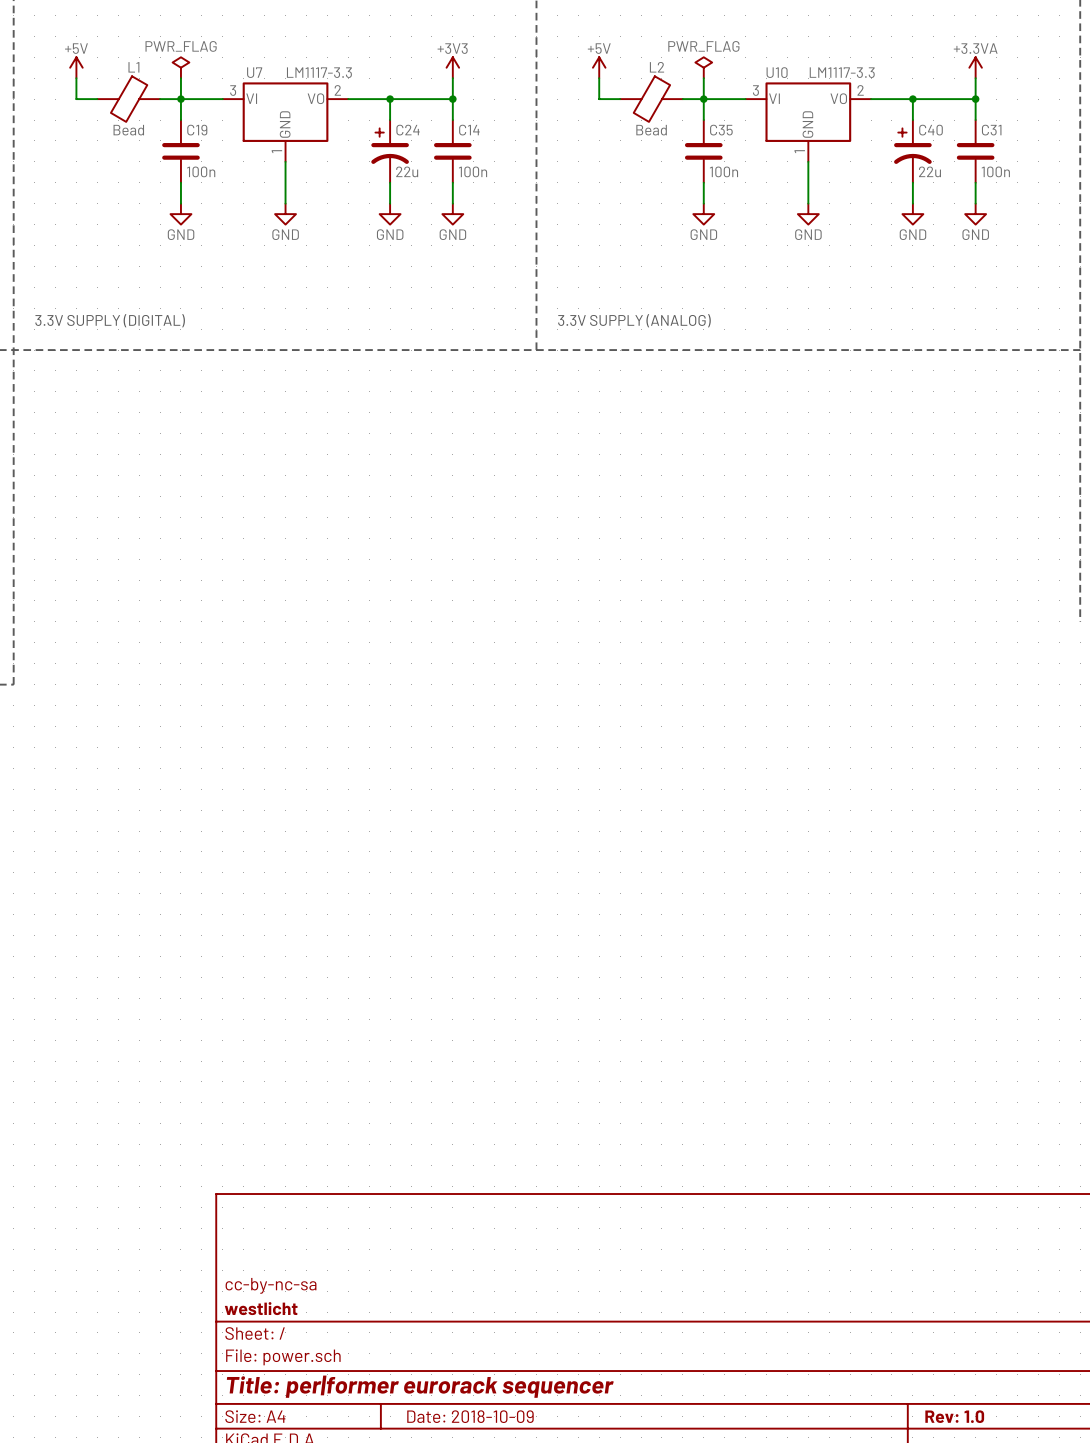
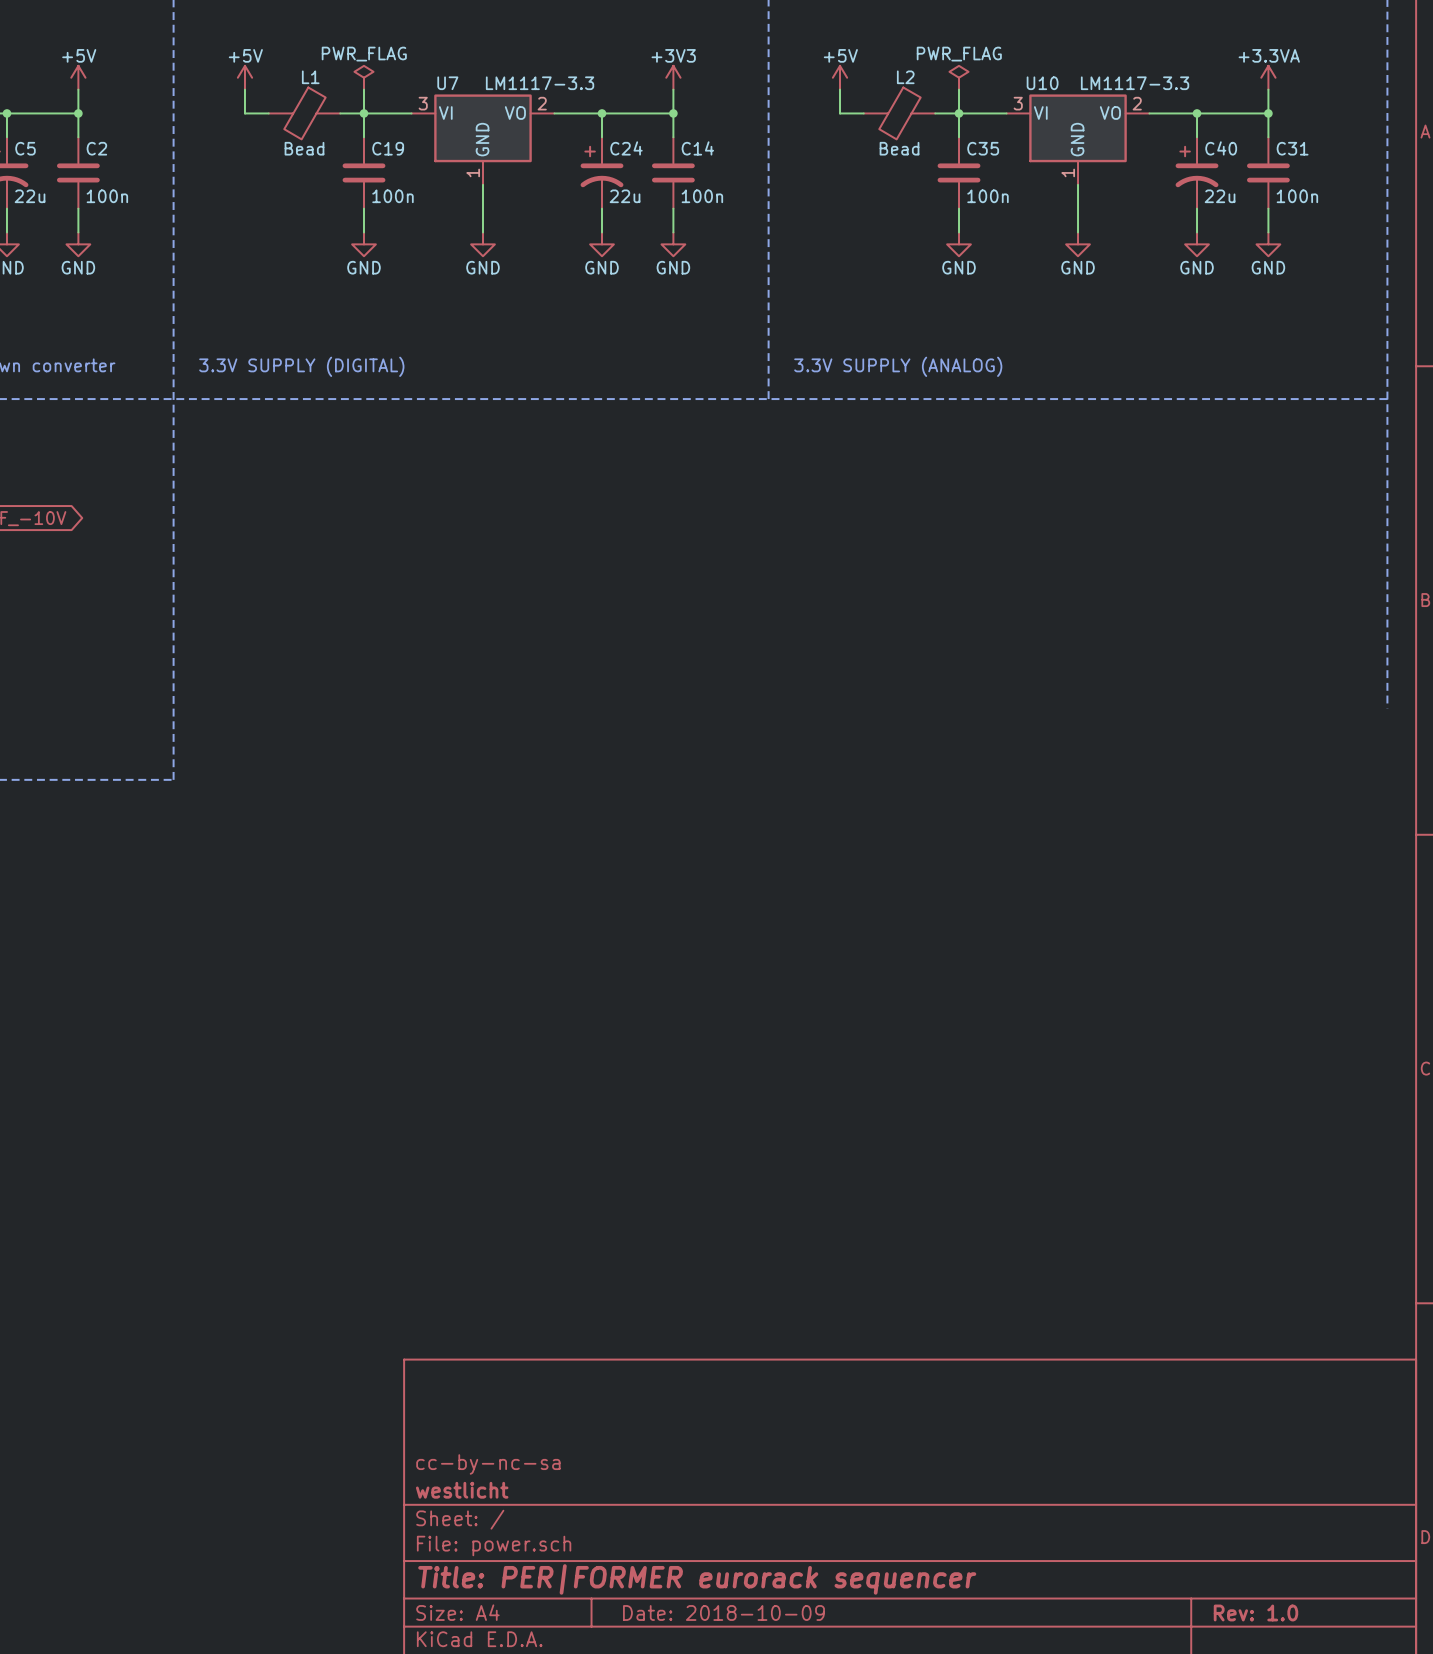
title block: Title: per|former eurorack sequencer (420, 1386) -> Title: PER|FORMER eurorack sequencer (697, 1579)

